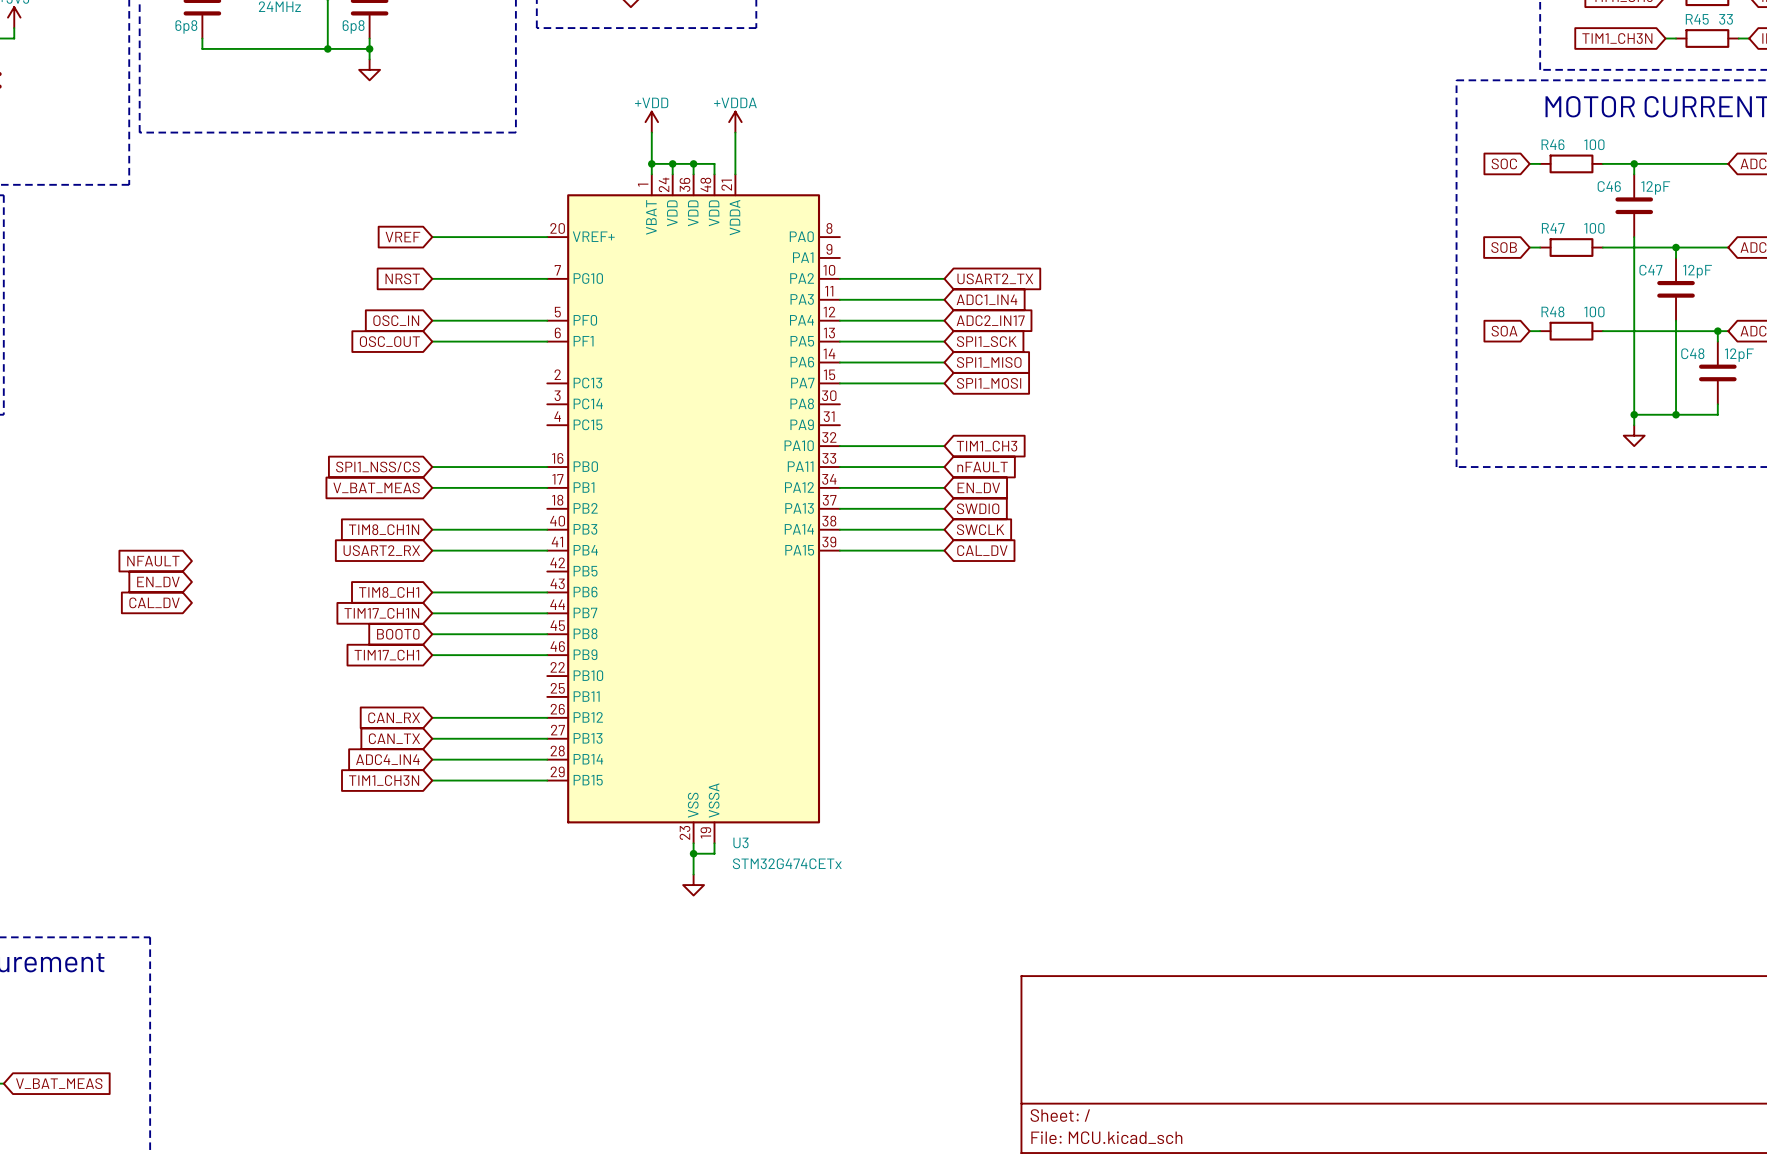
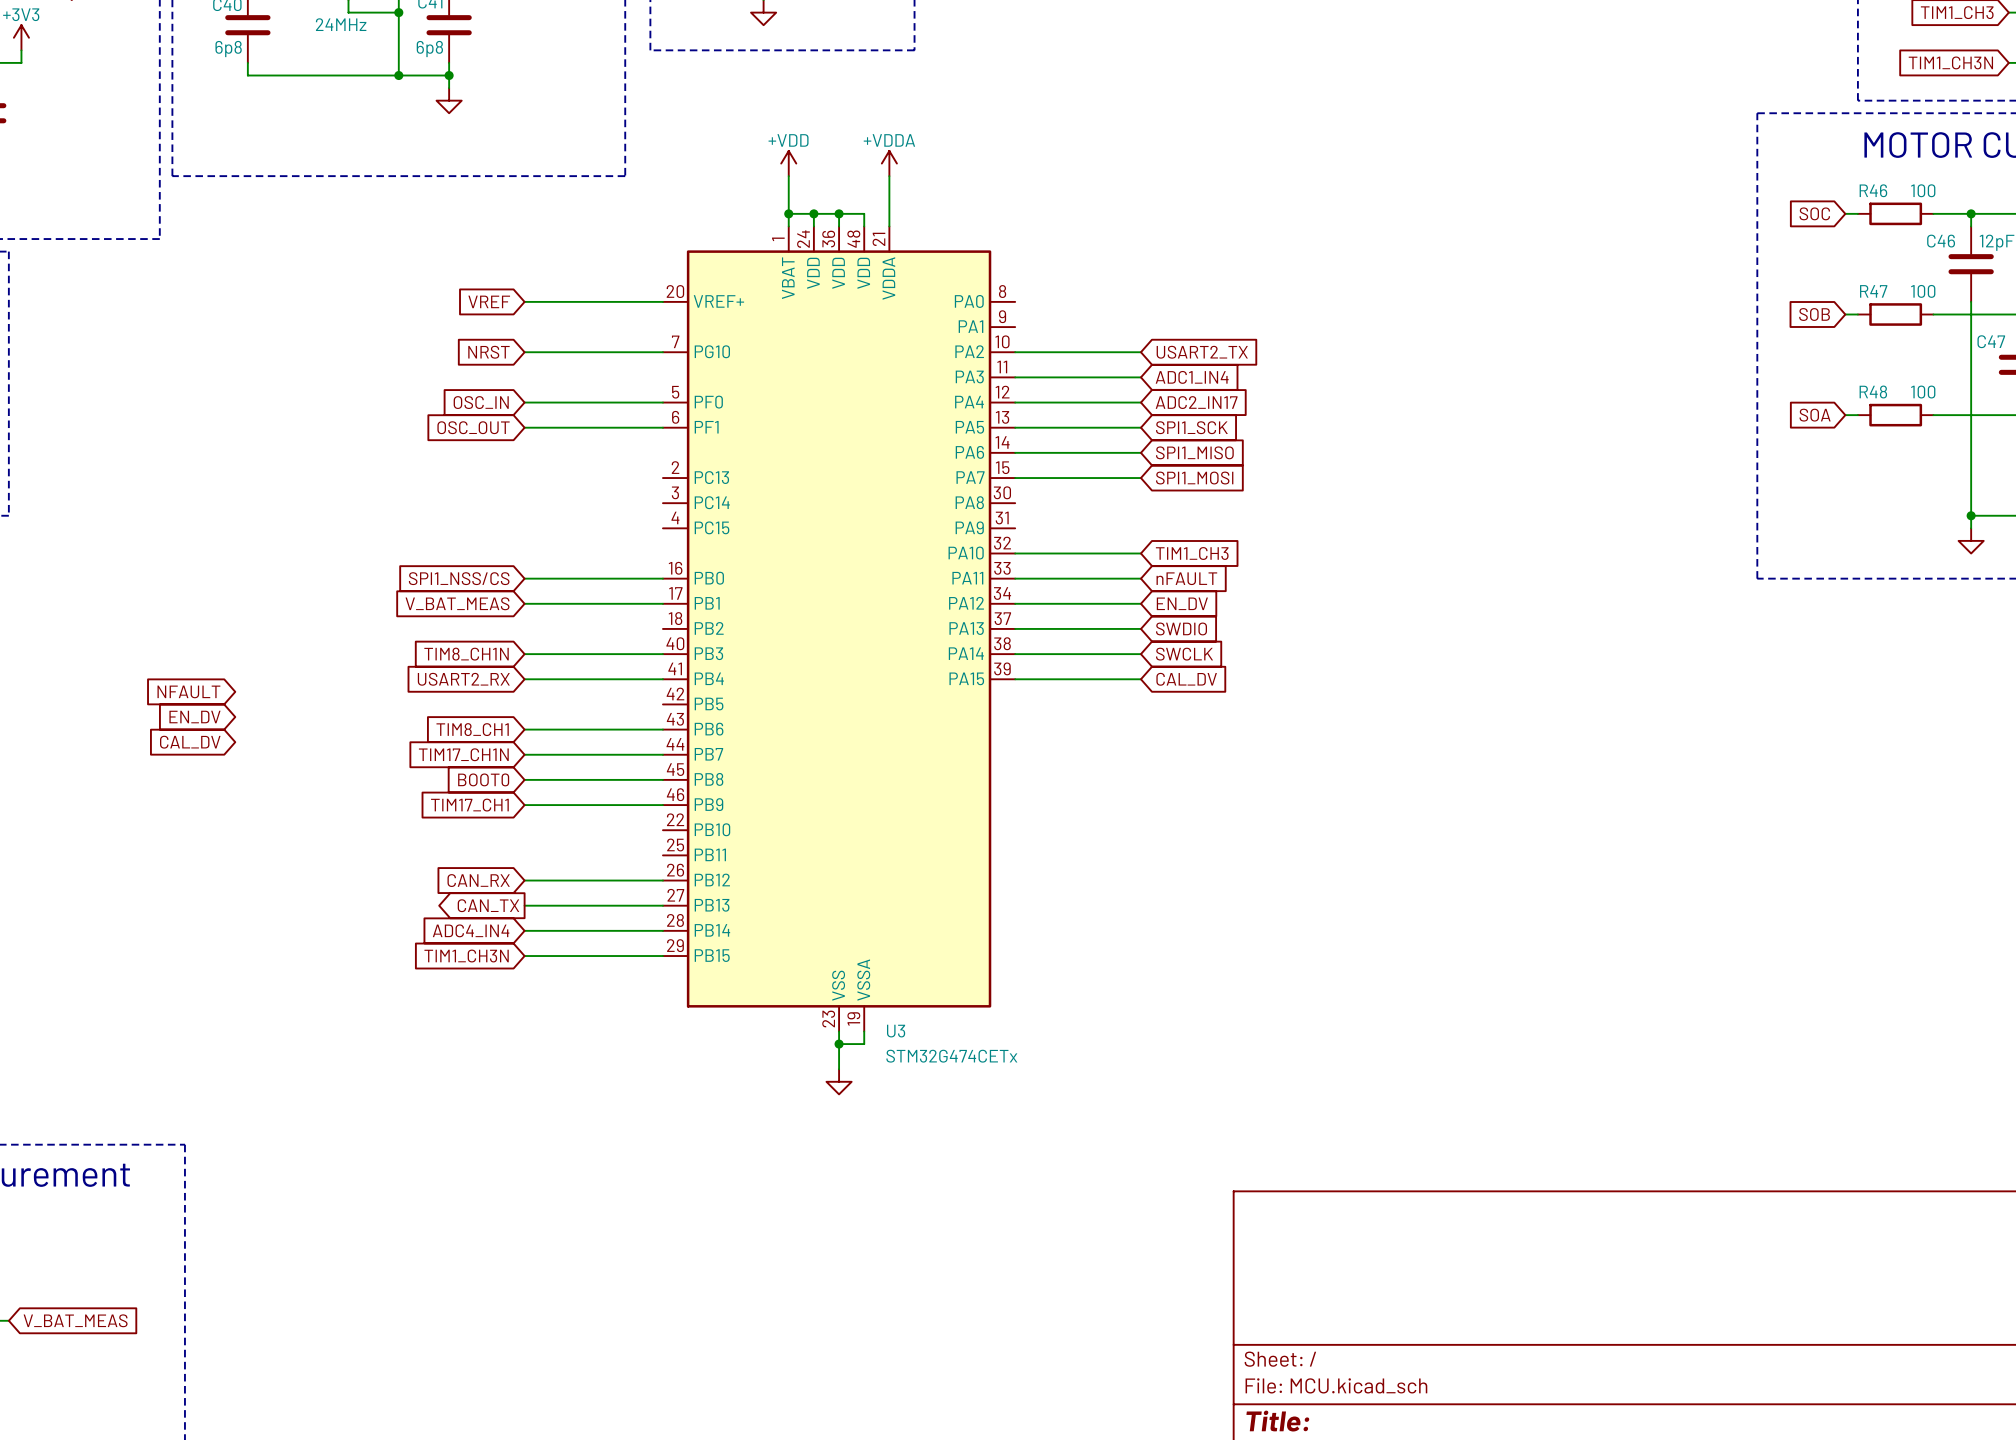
global label shape: input (394, 738) -> output (488, 905)

